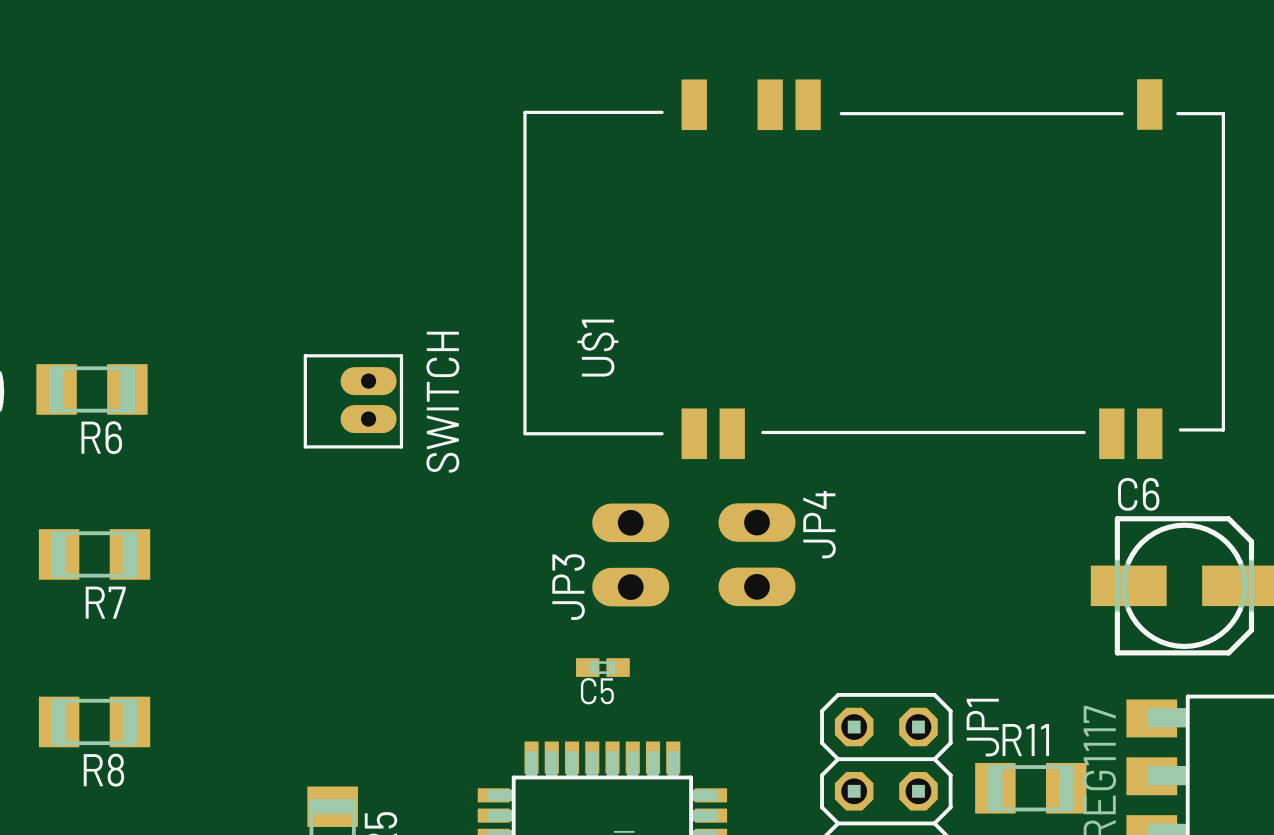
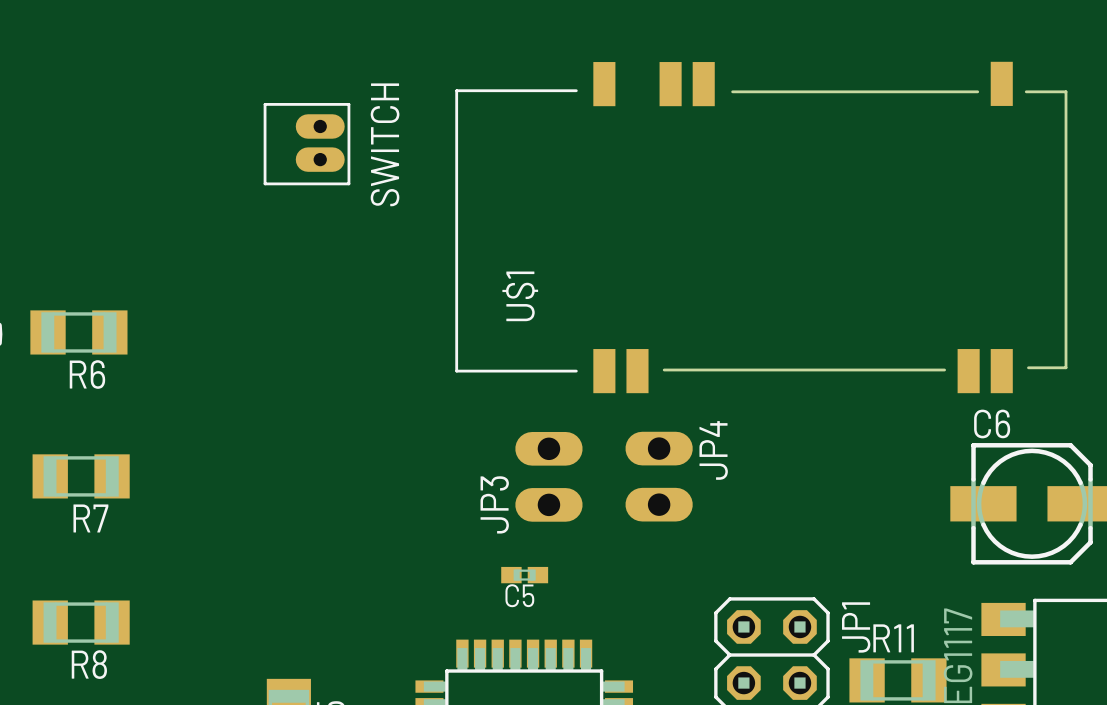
U$1 footprint: [523, 79, 1226, 460] -> [455, 61, 1068, 394]
SWITCH position: (353, 401) -> (306, 144)

